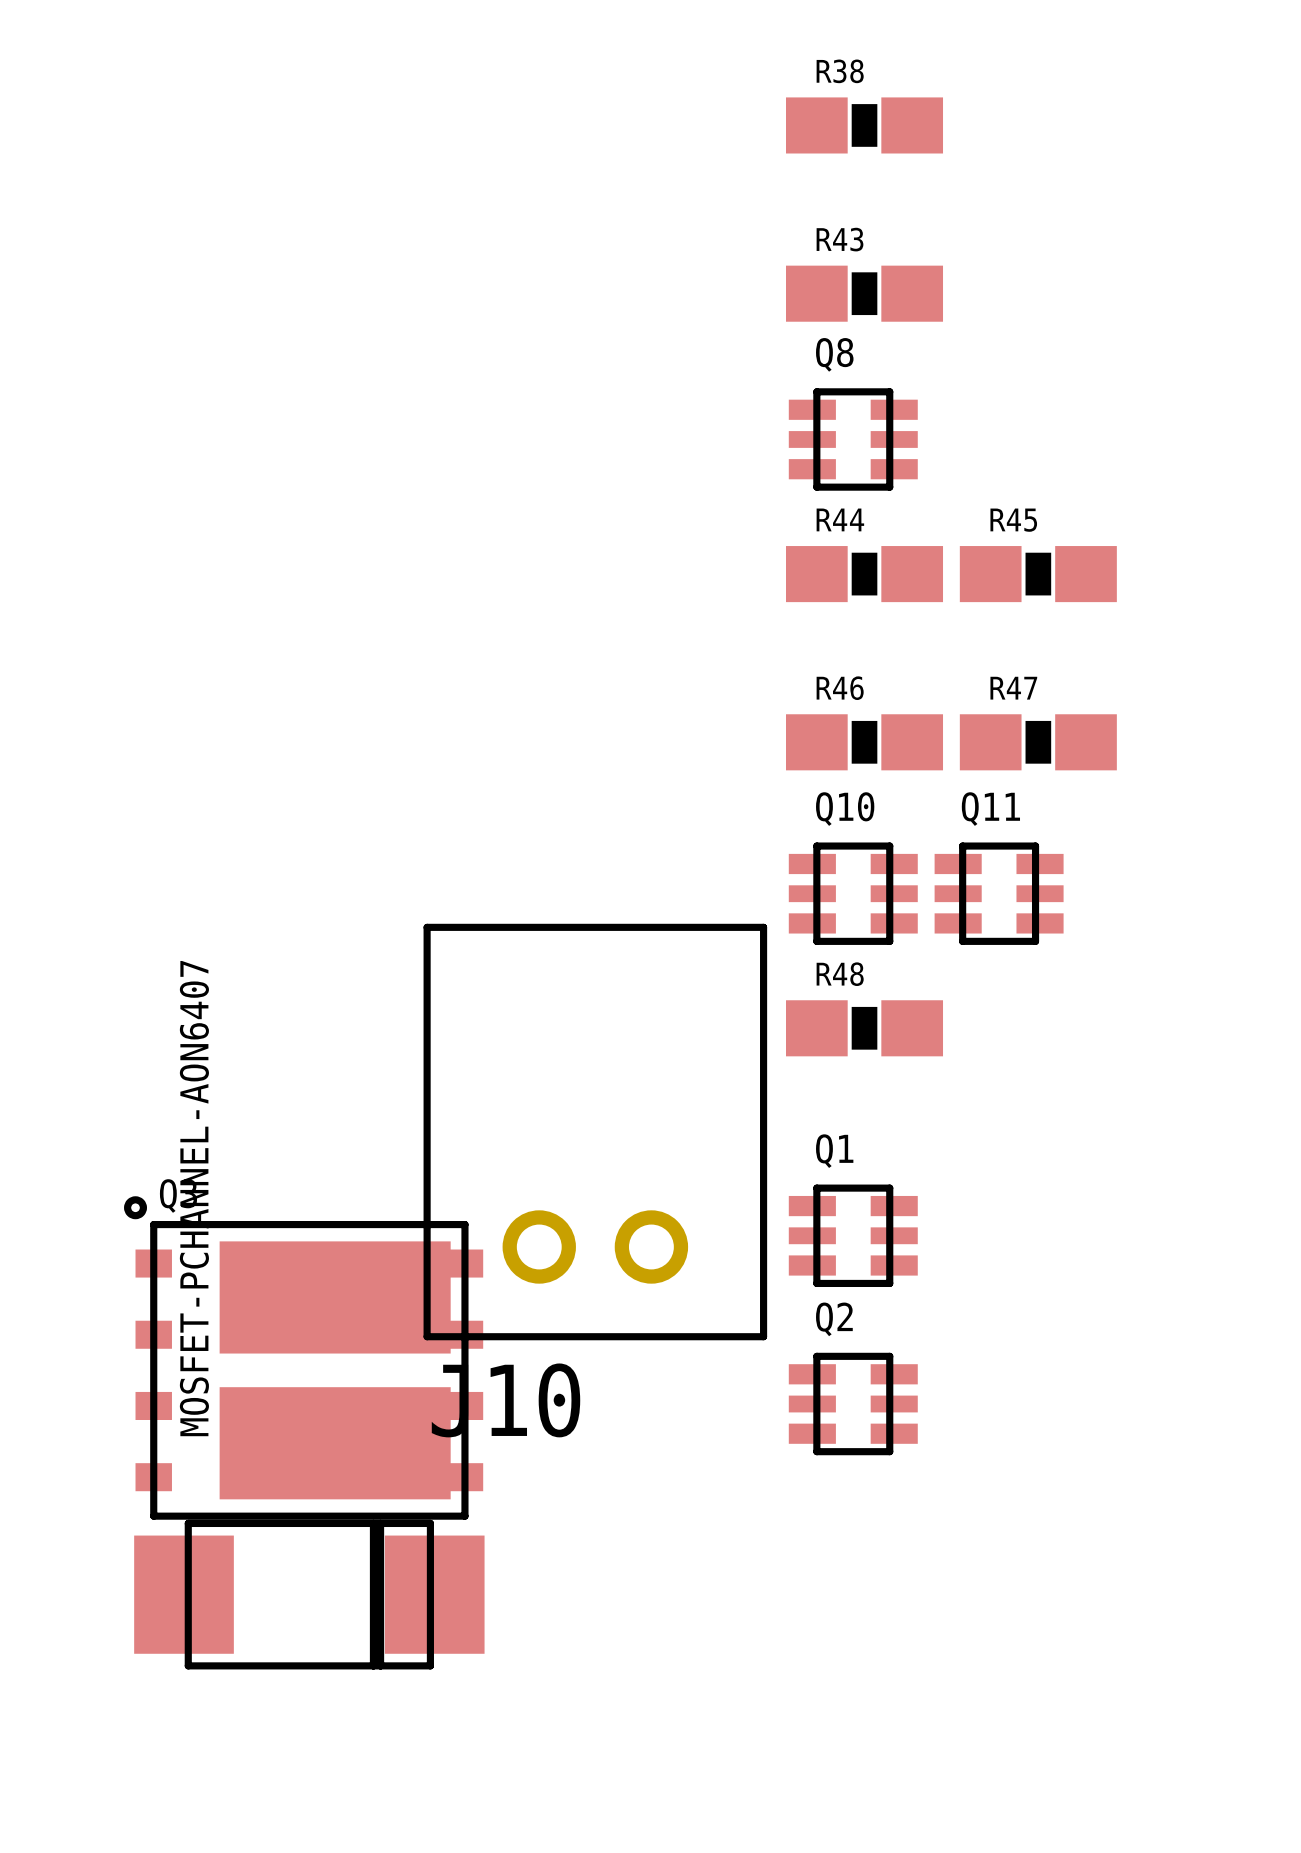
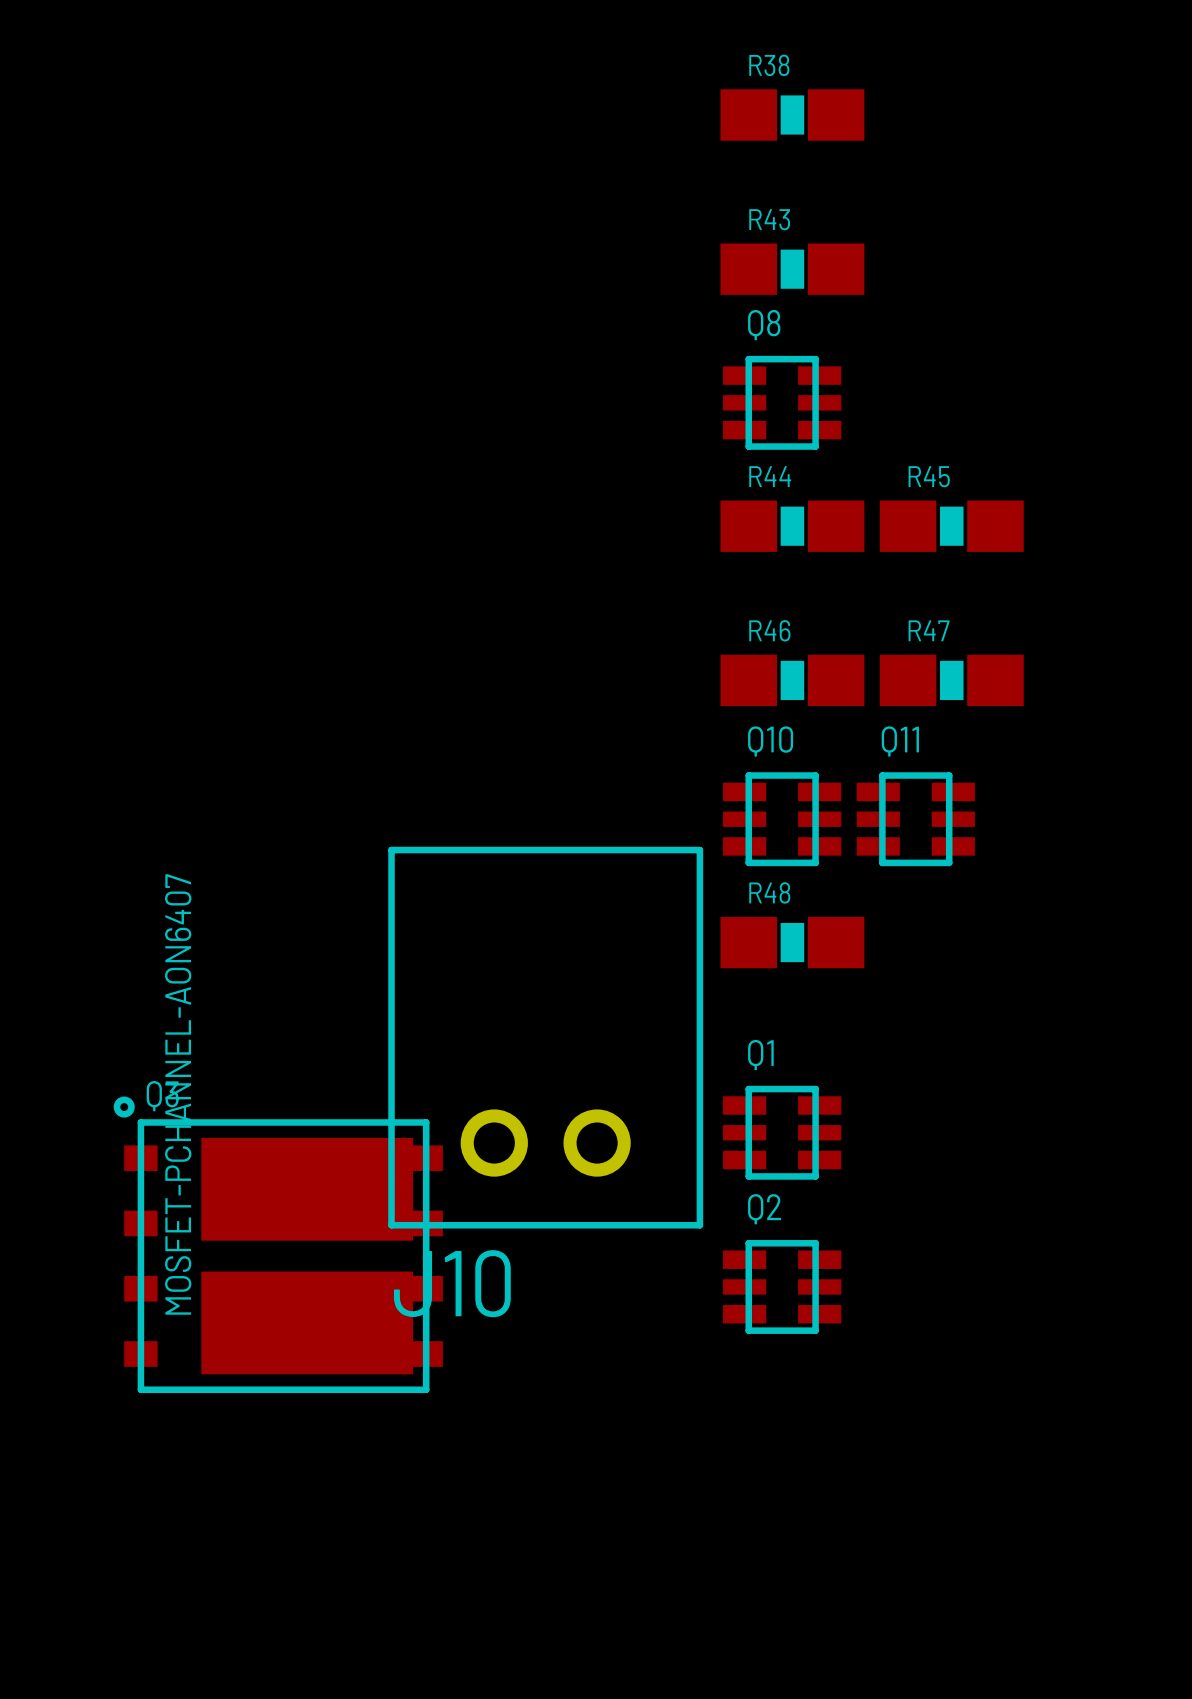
part: (309, 1594) -> none

